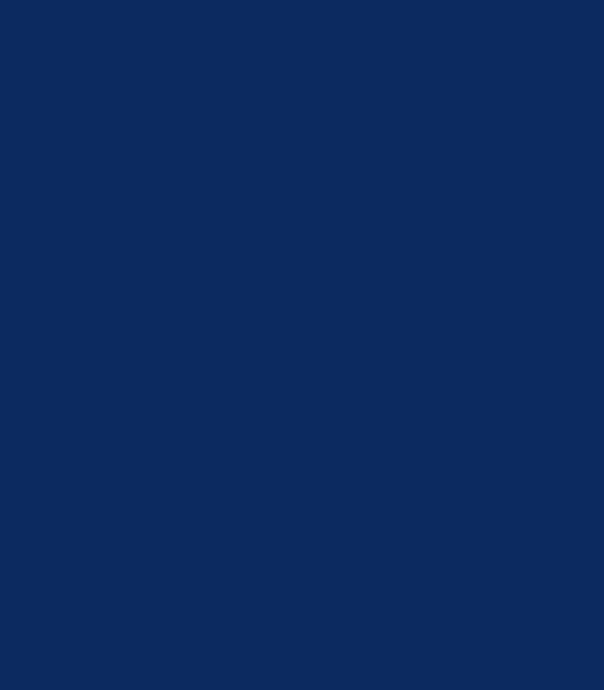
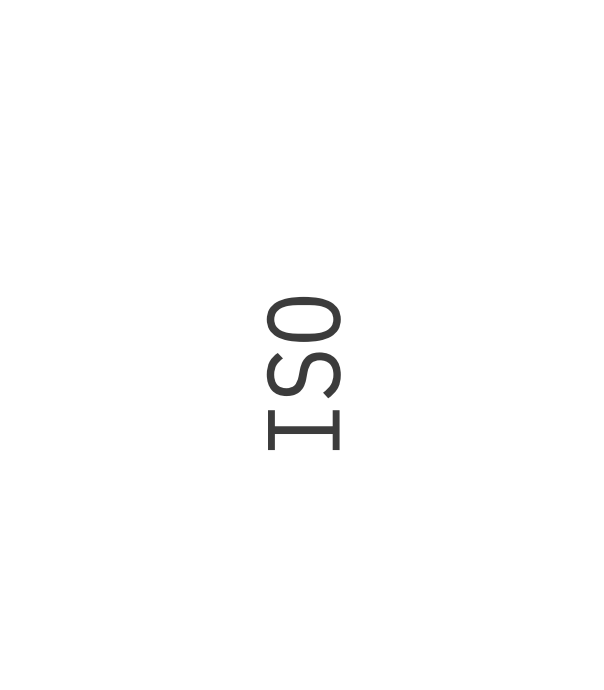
text: none -> ISO (303, 373)

